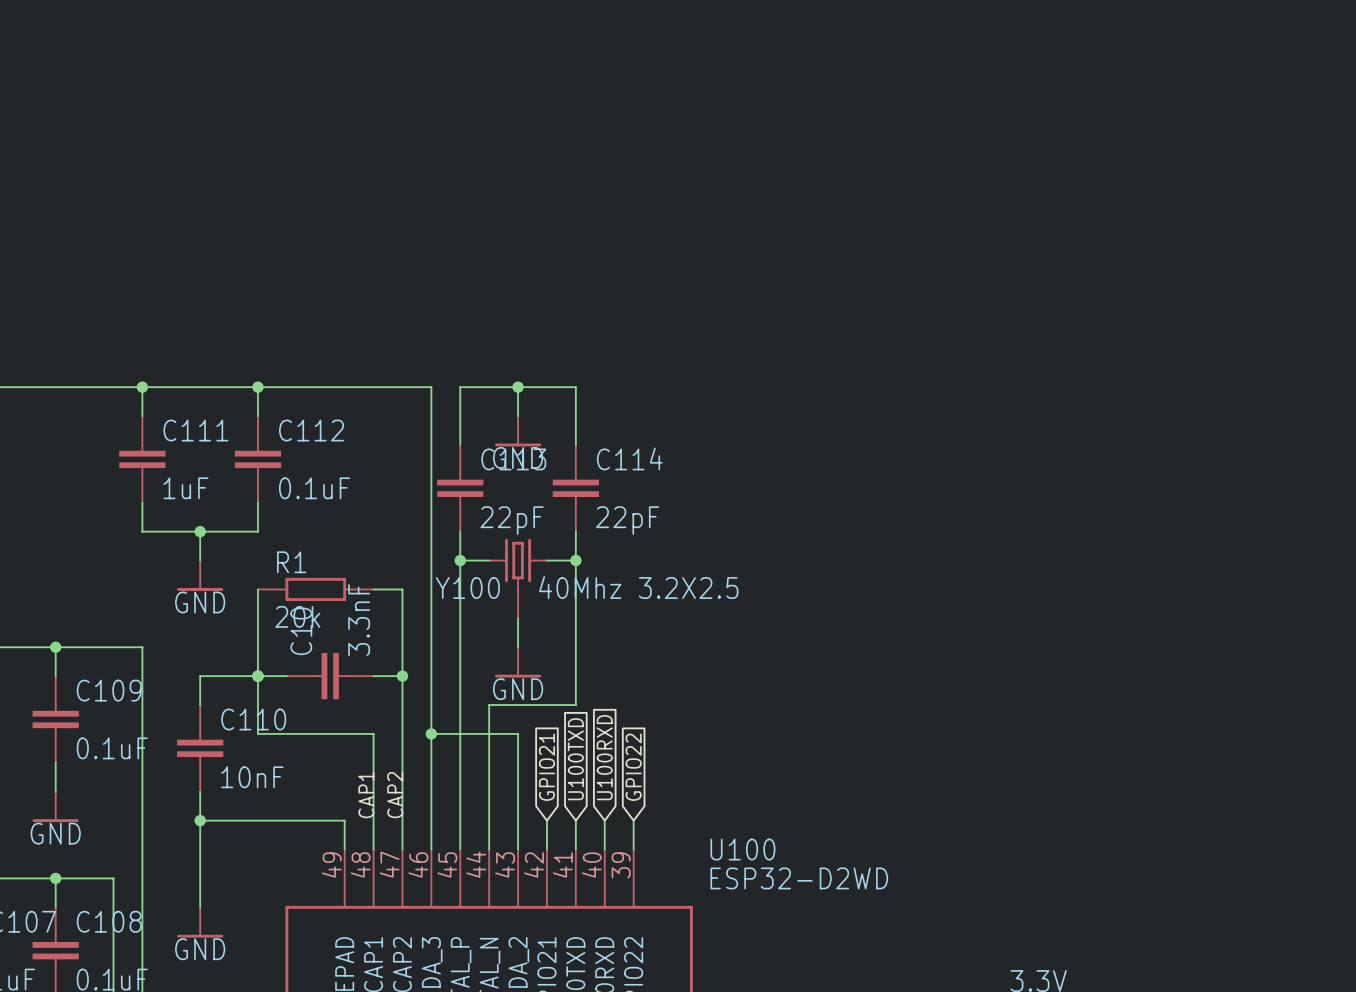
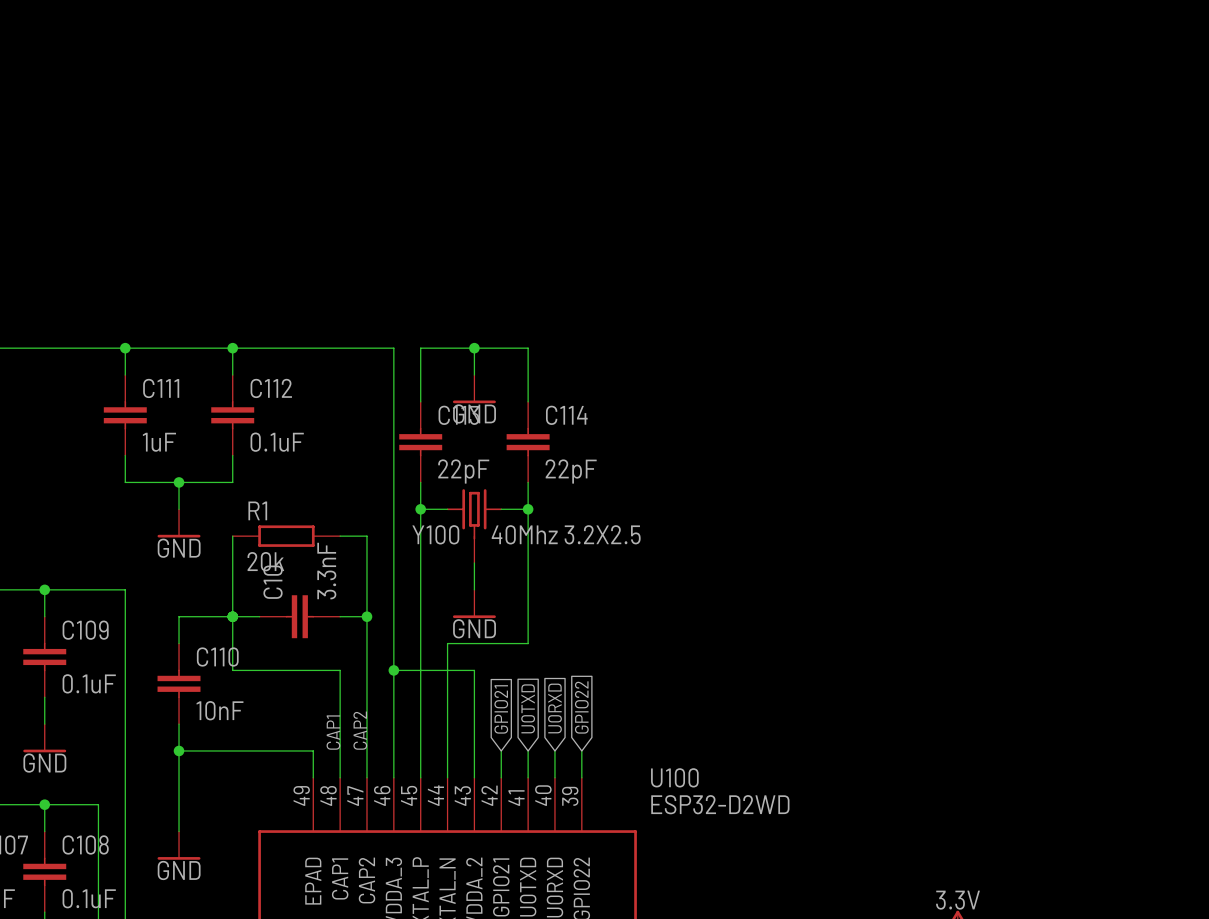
global label: U100RXD (604, 757) -> U0RXD (554, 708)
global label: U100TXD (575, 759) -> U0TXD (528, 708)

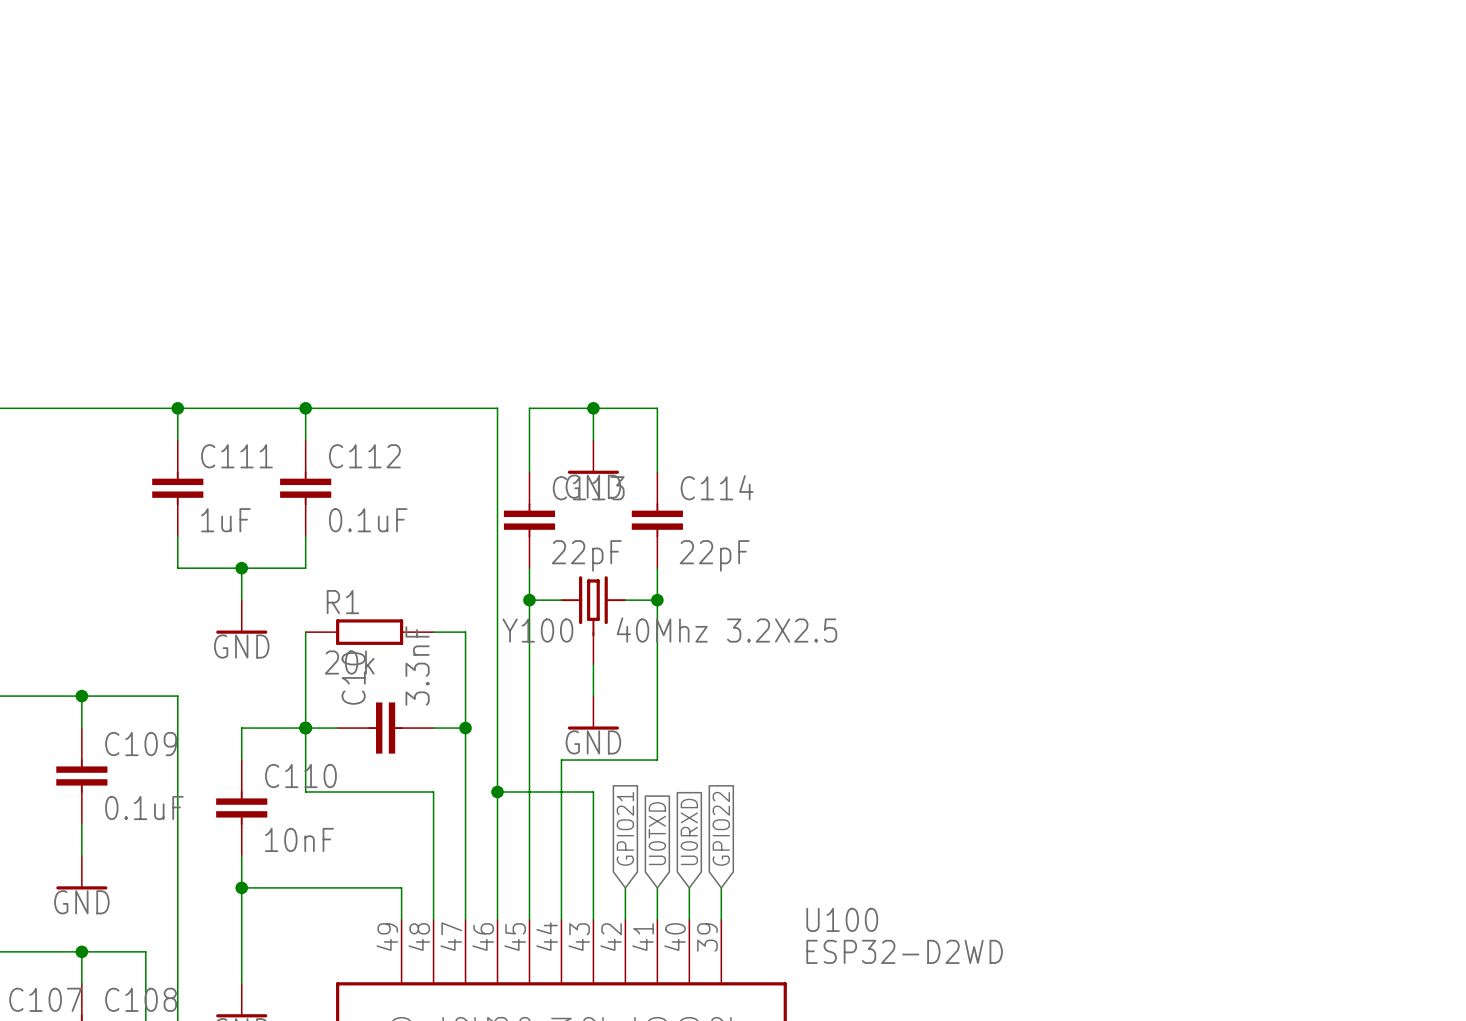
label: CAP2 (360, 730) -> none
label: CAP1 (333, 732) -> none

